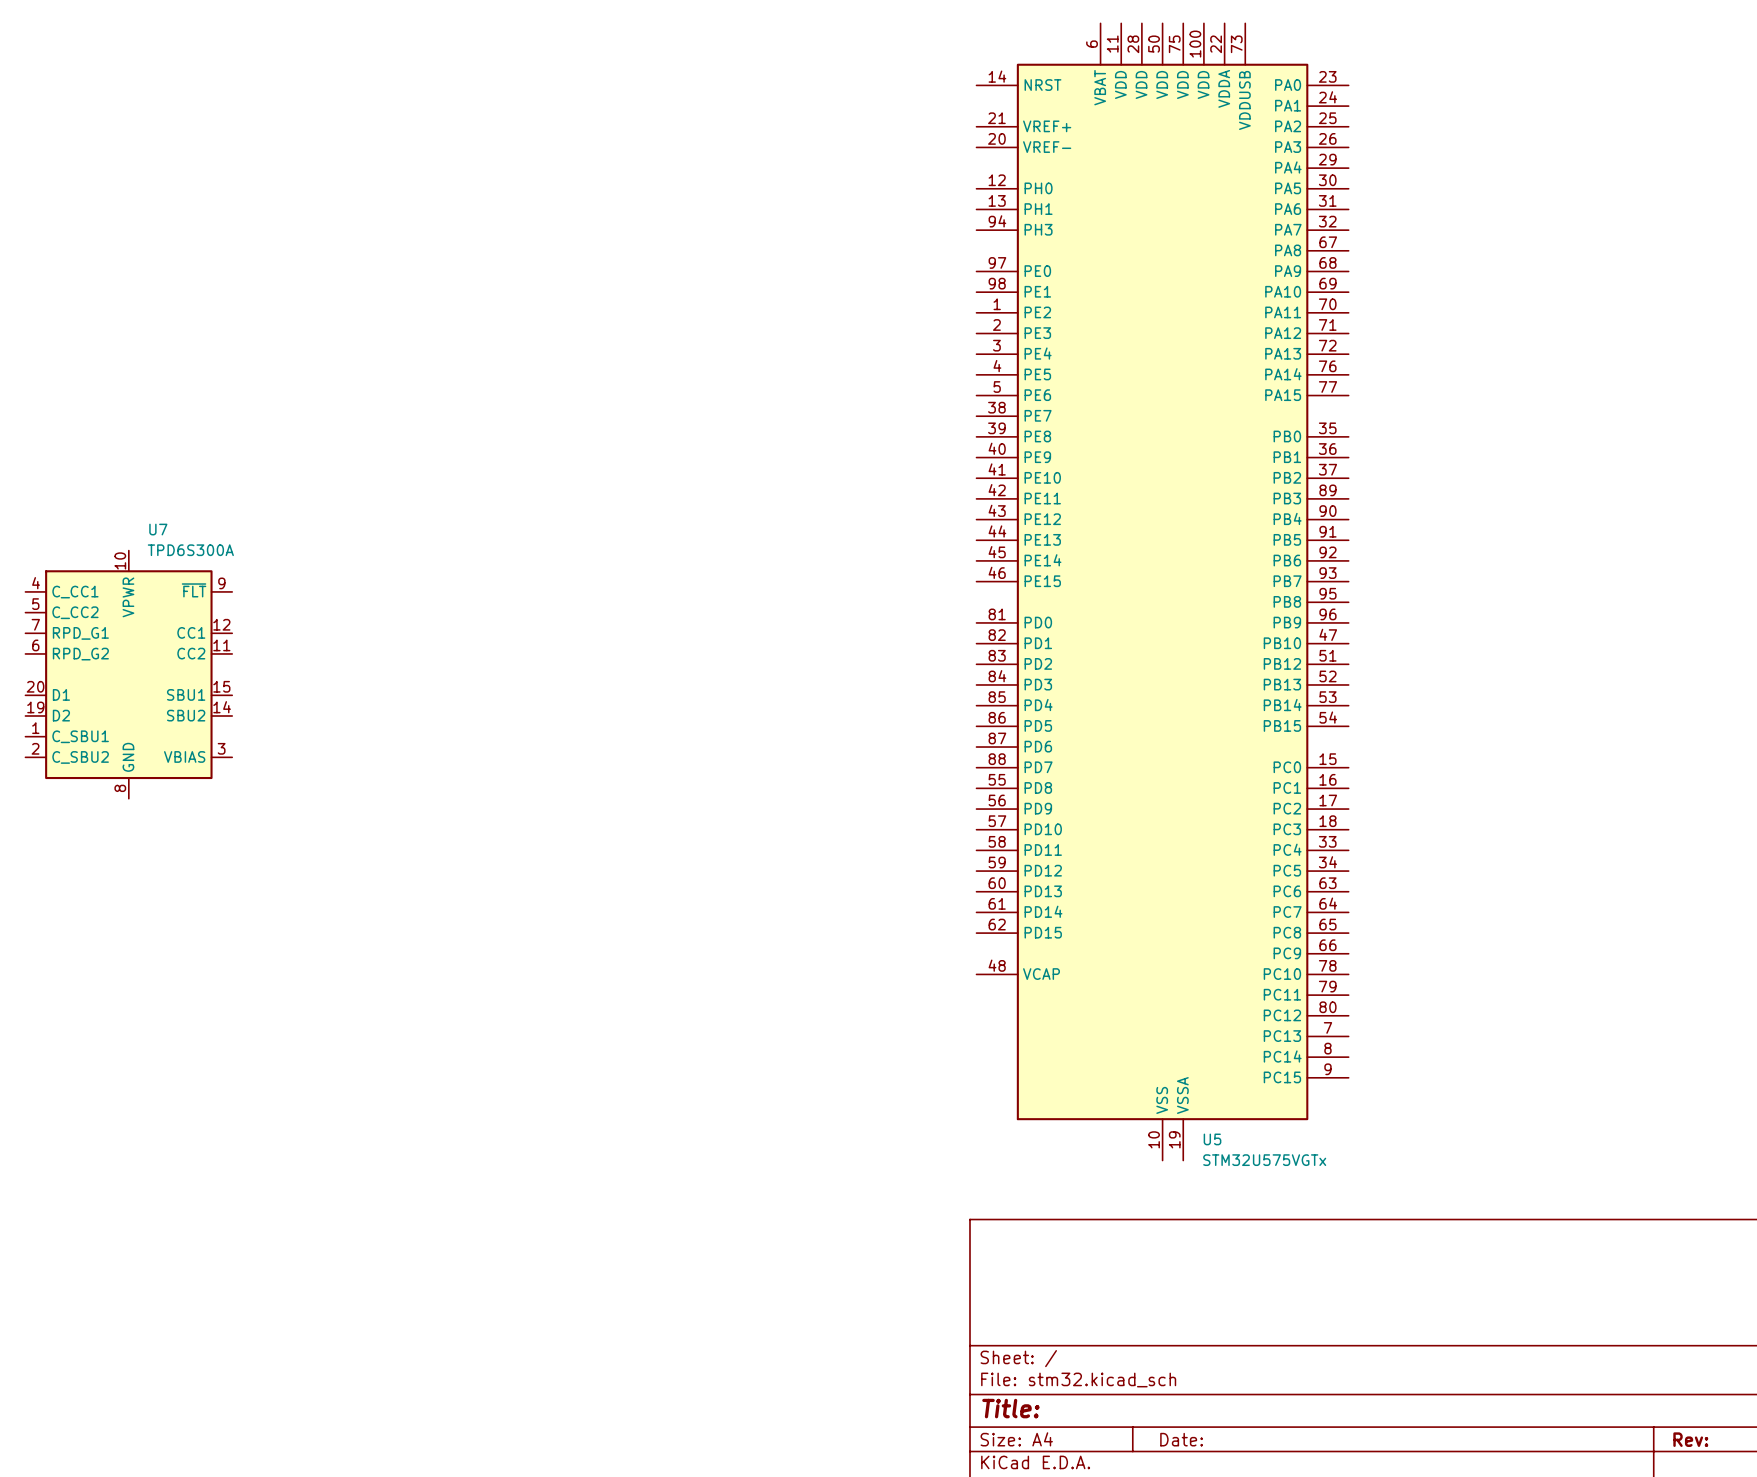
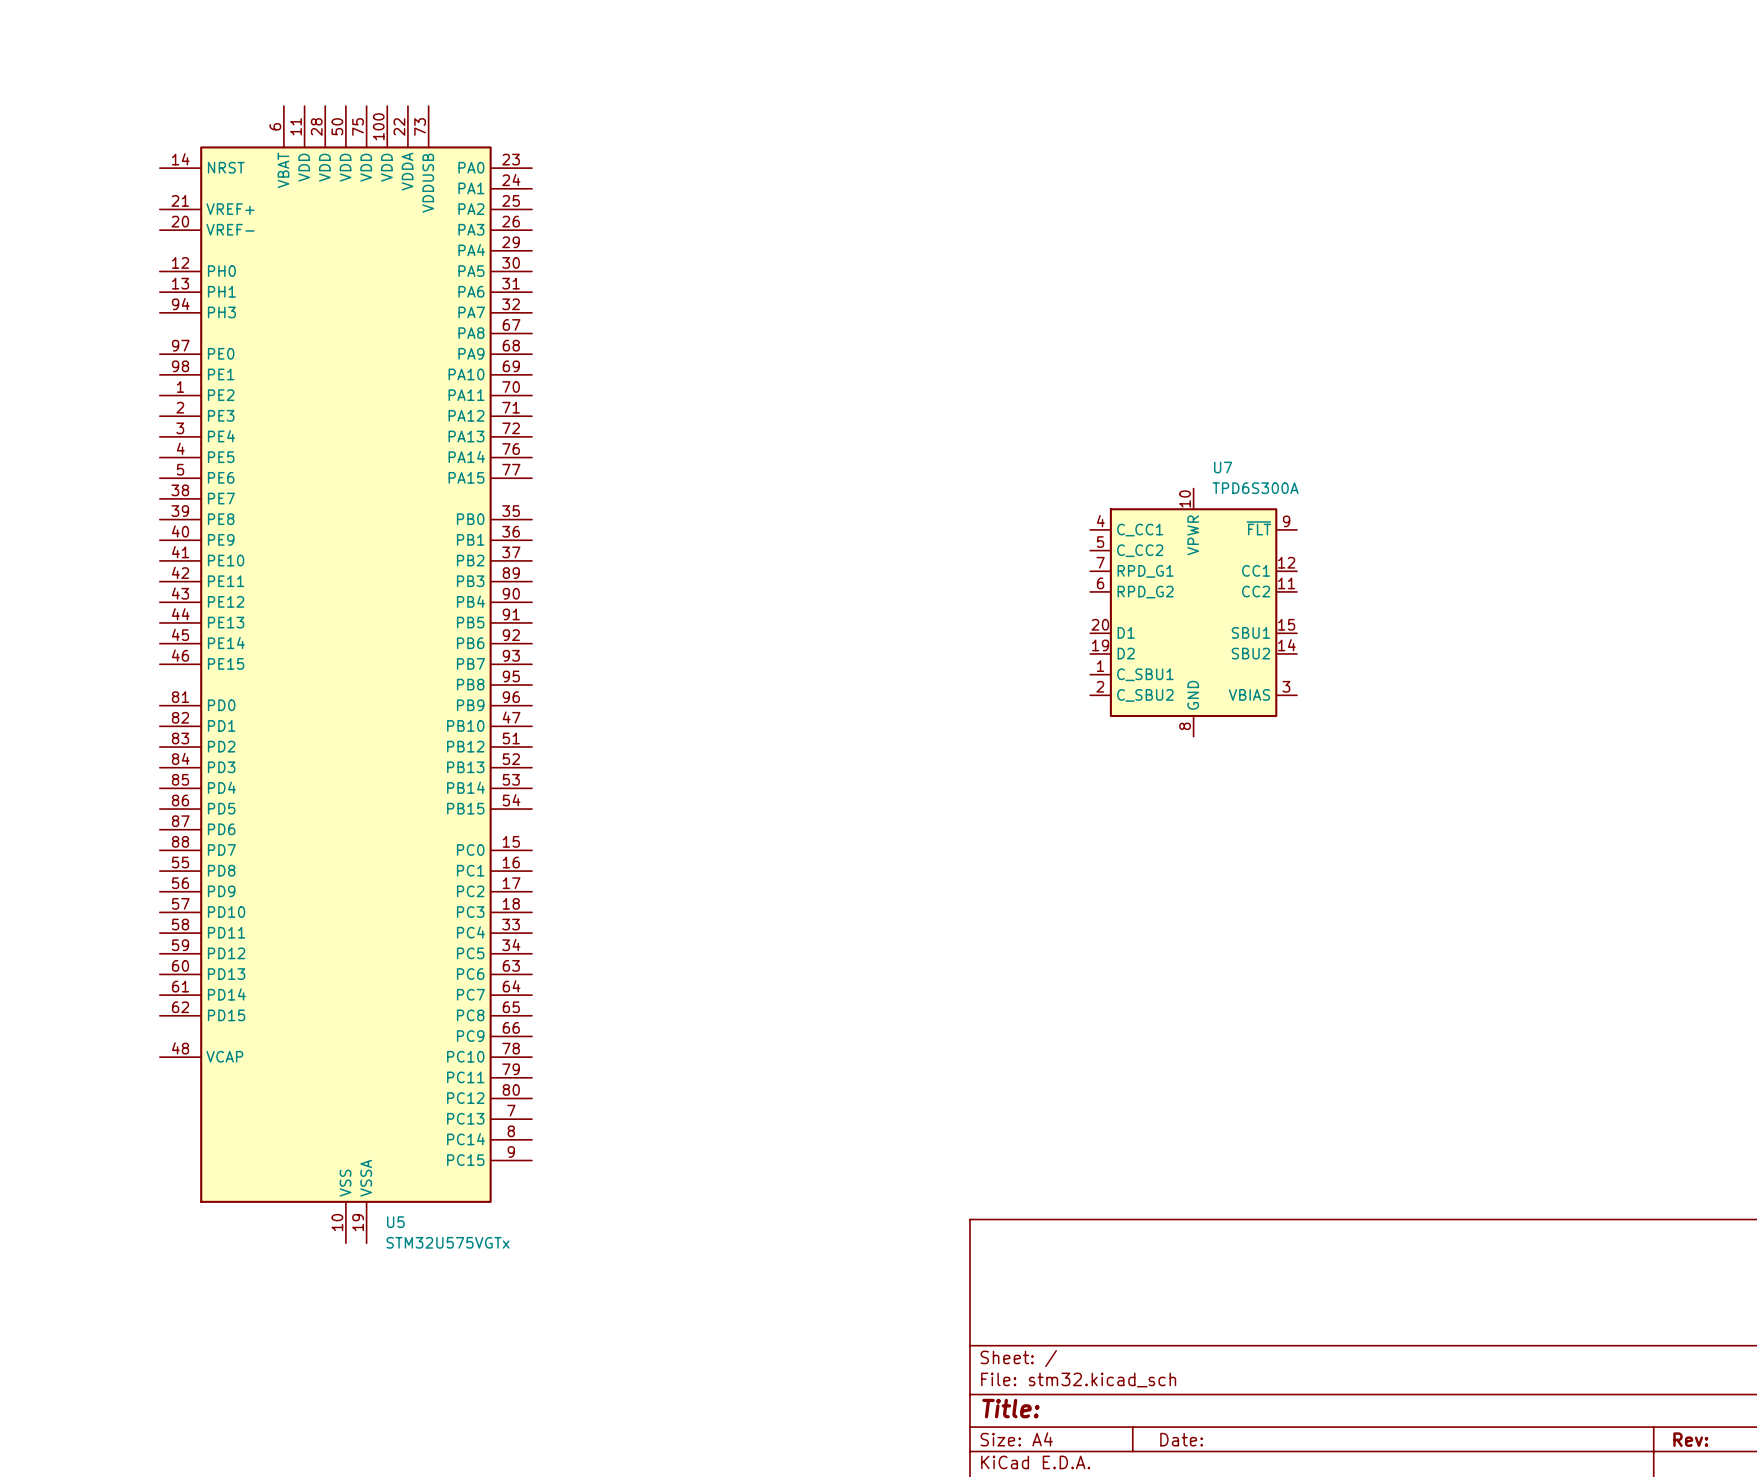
U5 position: (1162, 591) -> (345, 674)
U7 position: (128, 674) -> (1193, 612)

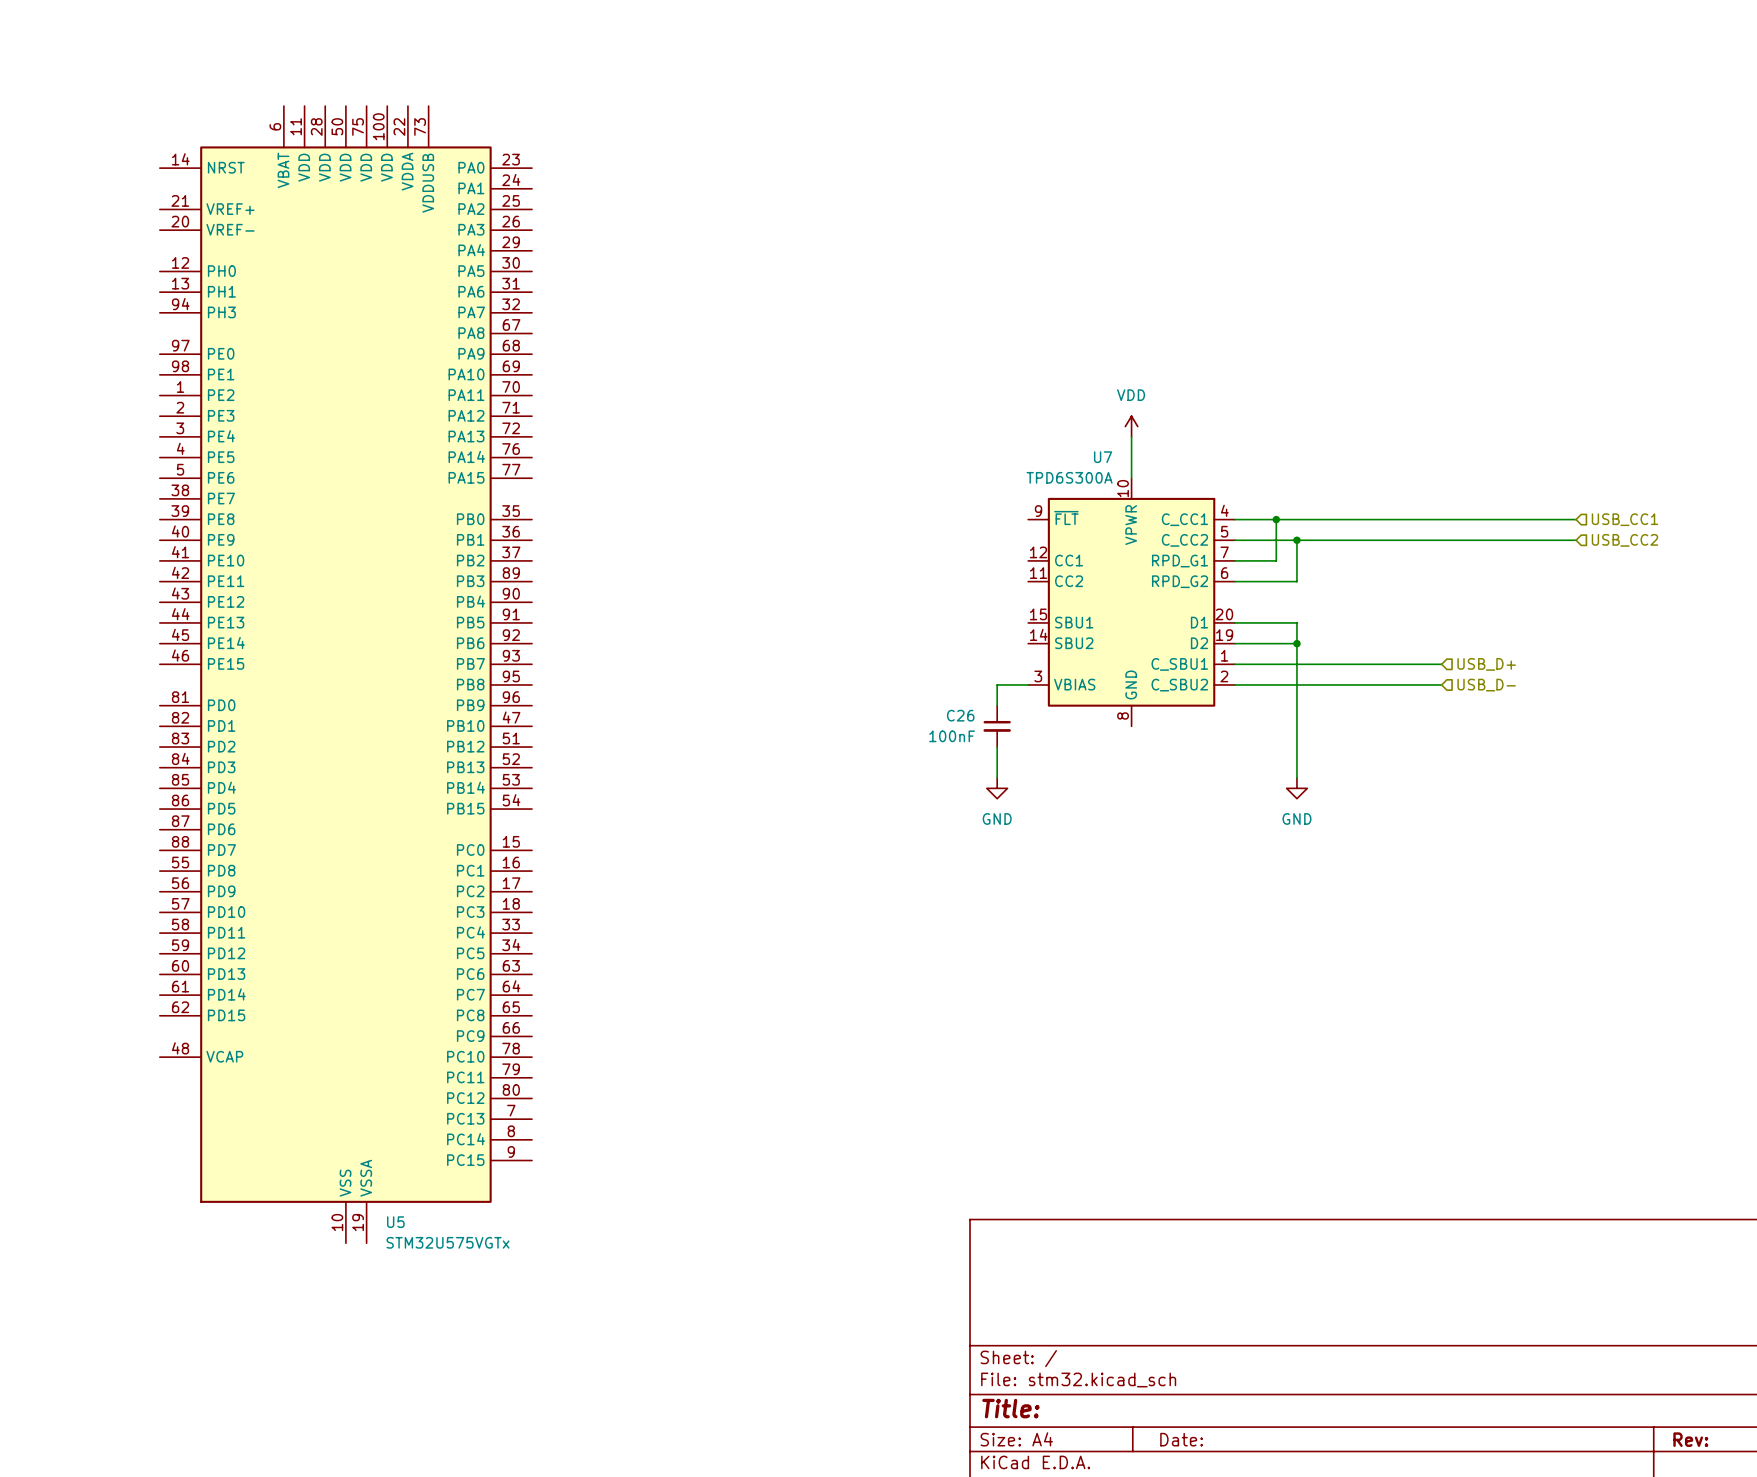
power symbol: none -> VDD (1131, 426)
wire: none -> (1131, 436) (1131, 478)
wire: none -> (1234, 519) (1576, 519)
junction: none -> (1276, 519)
hierarchical label: none -> USB_CC1 (1624, 519)
wire: none -> (1234, 540) (1576, 540)
wire: none -> (1296, 540) (1296, 581) (1234, 581)
junction: none -> (1296, 540)
hierarchical label: none -> USB_CC2 (1624, 540)
U7 flip: as is (1193, 612) -> left-right (1131, 602)
wire: none -> (1234, 622) (1296, 622) (1296, 778)
junction: none -> (1296, 643)
wire: none -> (1234, 664) (1441, 664)
hierarchical label: none -> USB_D+ (1486, 664)
wire: none -> (1028, 684) (997, 684) (997, 705)
wire: none -> (1234, 684) (1441, 684)
hierarchical label: none -> USB_D- (1486, 685)
C26: none -> 100nF (997, 726)
wire: none -> (997, 747) (997, 778)
power symbol: none -> GND (997, 788)
power symbol: none -> GND (1296, 788)

